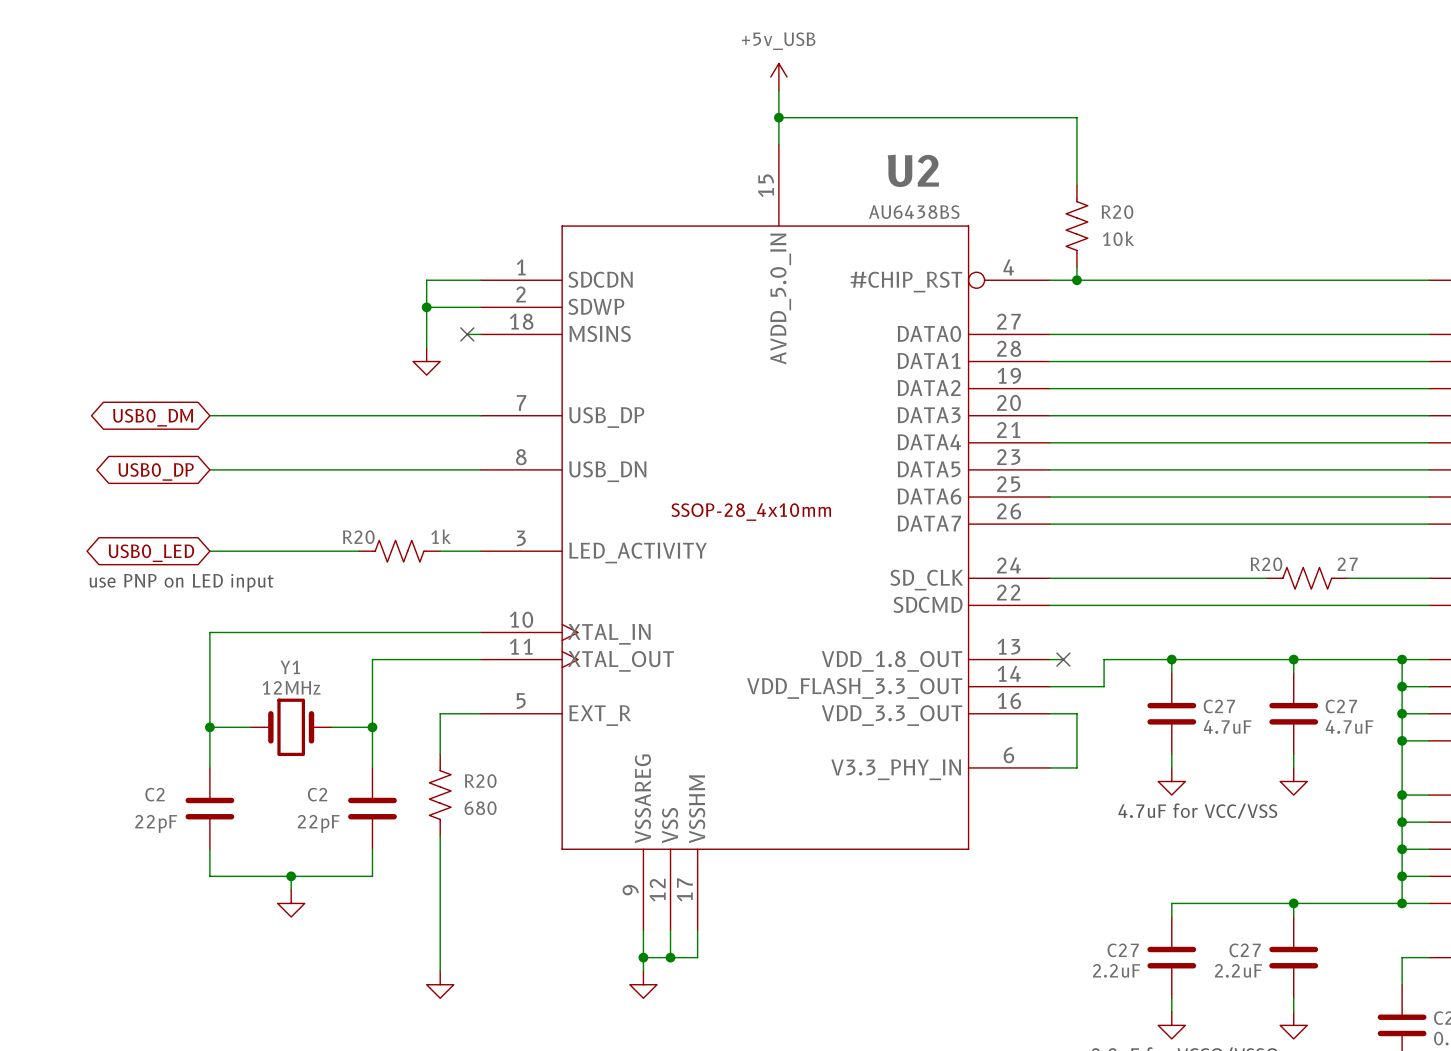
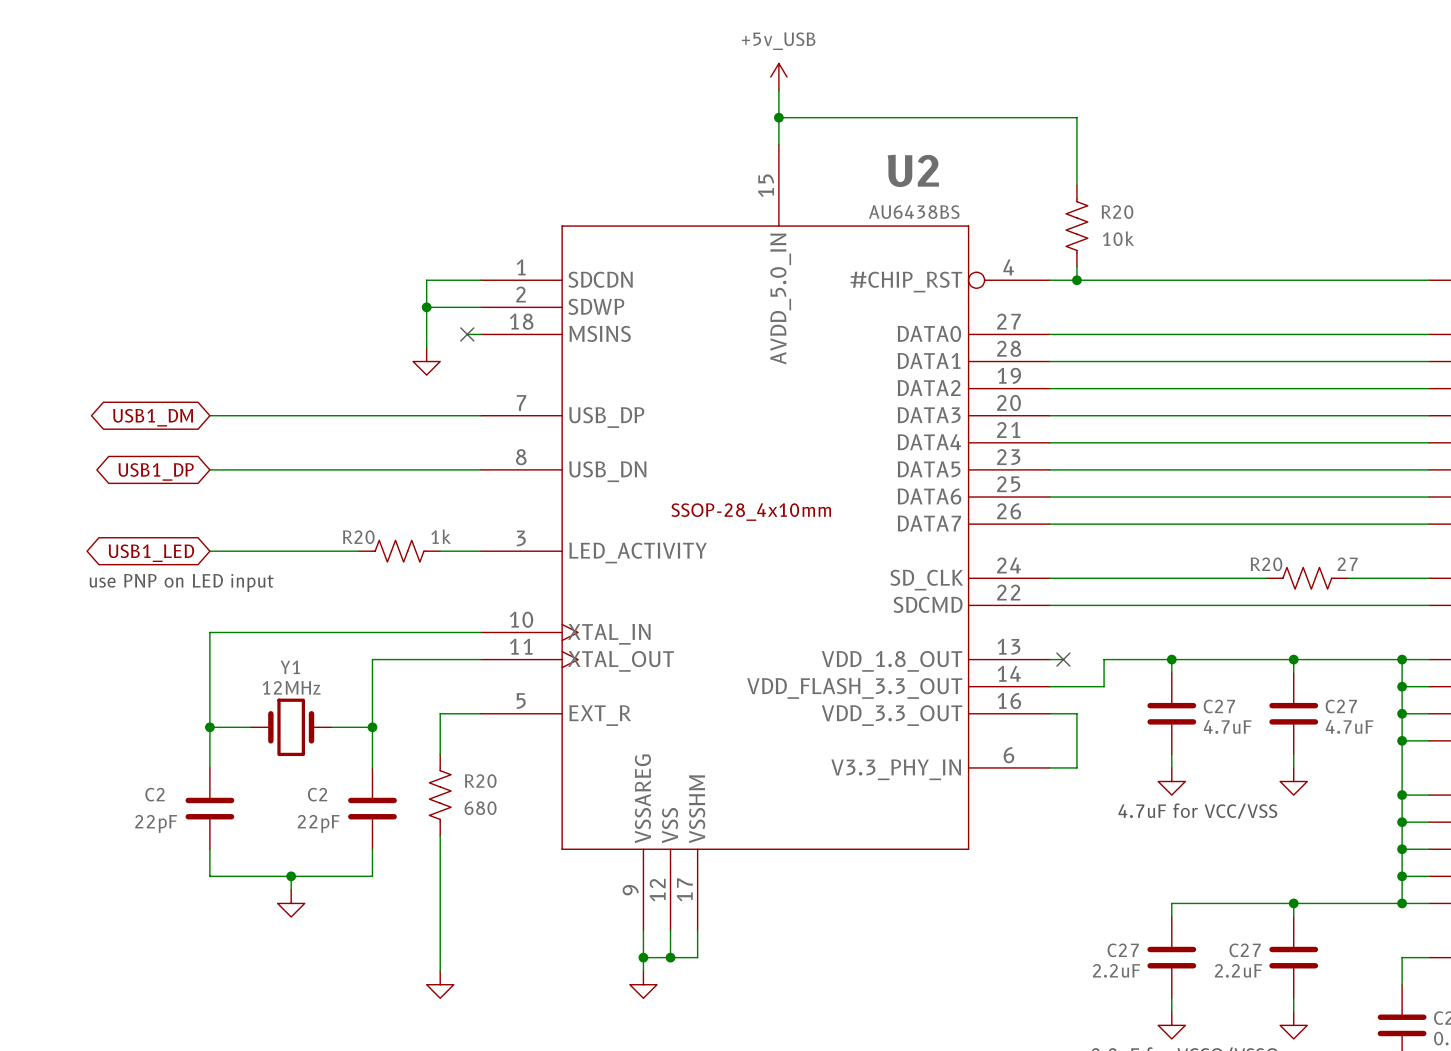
global label: USB0_DM (153, 417) -> USB1_DM (153, 417)
global label: USB0_DP (156, 471) -> USB1_DP (156, 471)
global label: USB0_LED (151, 553) -> USB1_LED (151, 553)

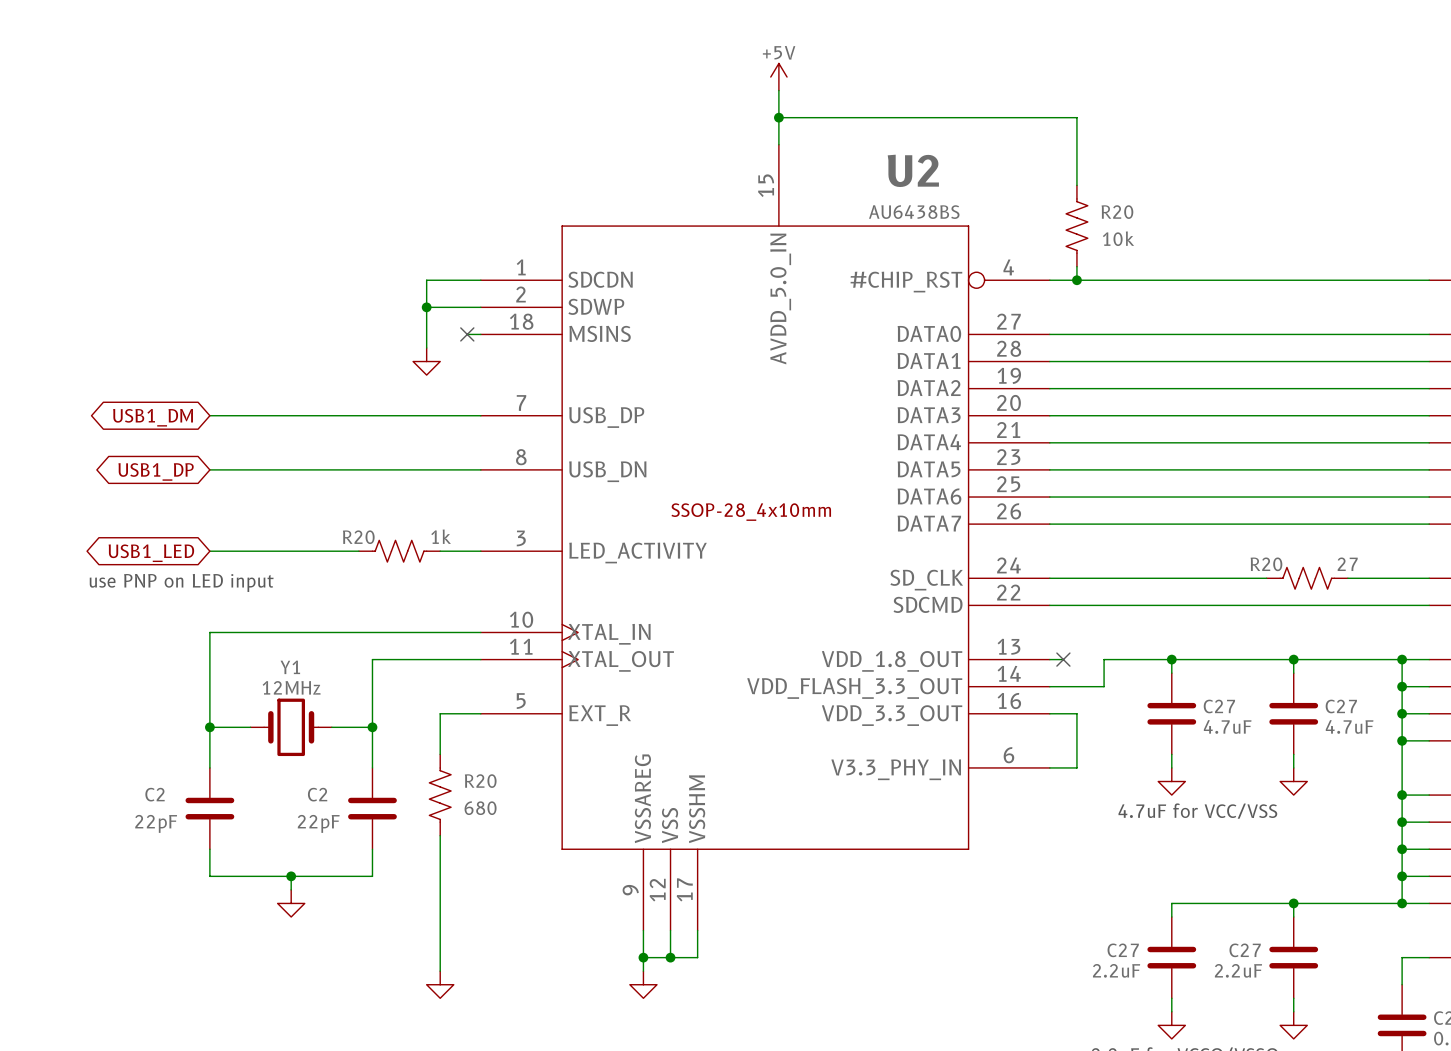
power symbol: +5v_USB (778, 77) -> +5V (778, 77)

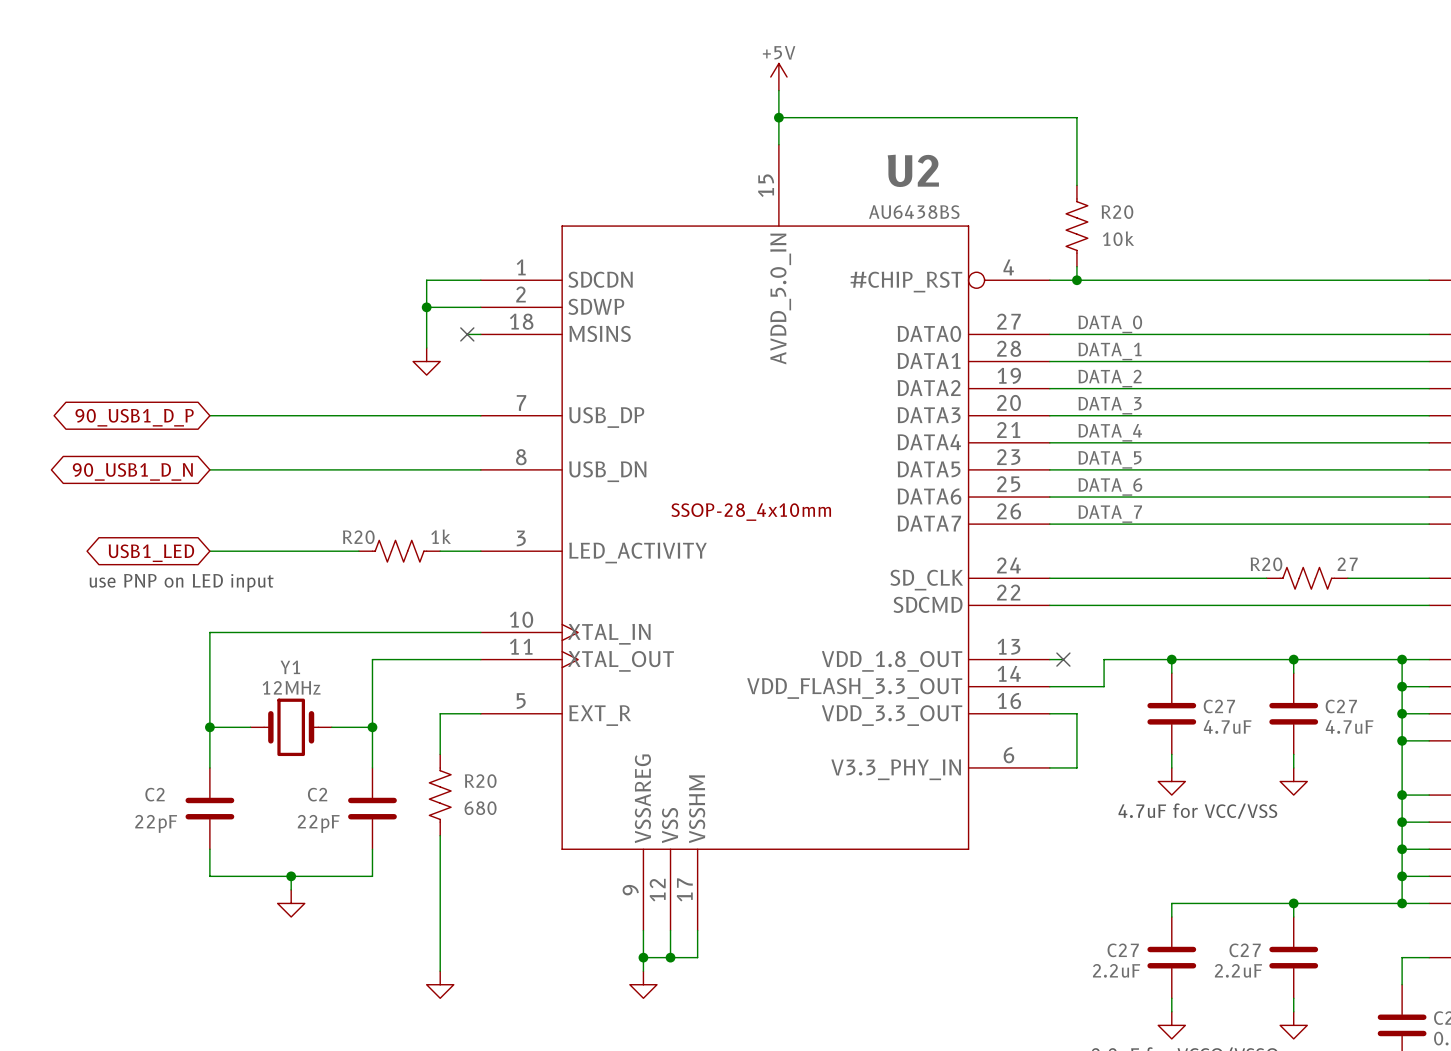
label: none -> DATA_0 (1110, 324)
label: none -> DATA_1 (1110, 351)
label: none -> DATA_2 (1110, 378)
label: none -> DATA_3 (1110, 405)
global label: USB1_DM (153, 417) -> 90_USB1_D_P (134, 417)
label: none -> DATA_4 (1110, 432)
label: none -> DATA_5 (1110, 459)
global label: USB1_DP (156, 471) -> 90_USB1_D_N (132, 471)
label: none -> DATA_6 (1110, 486)
label: none -> DATA_7 (1110, 514)

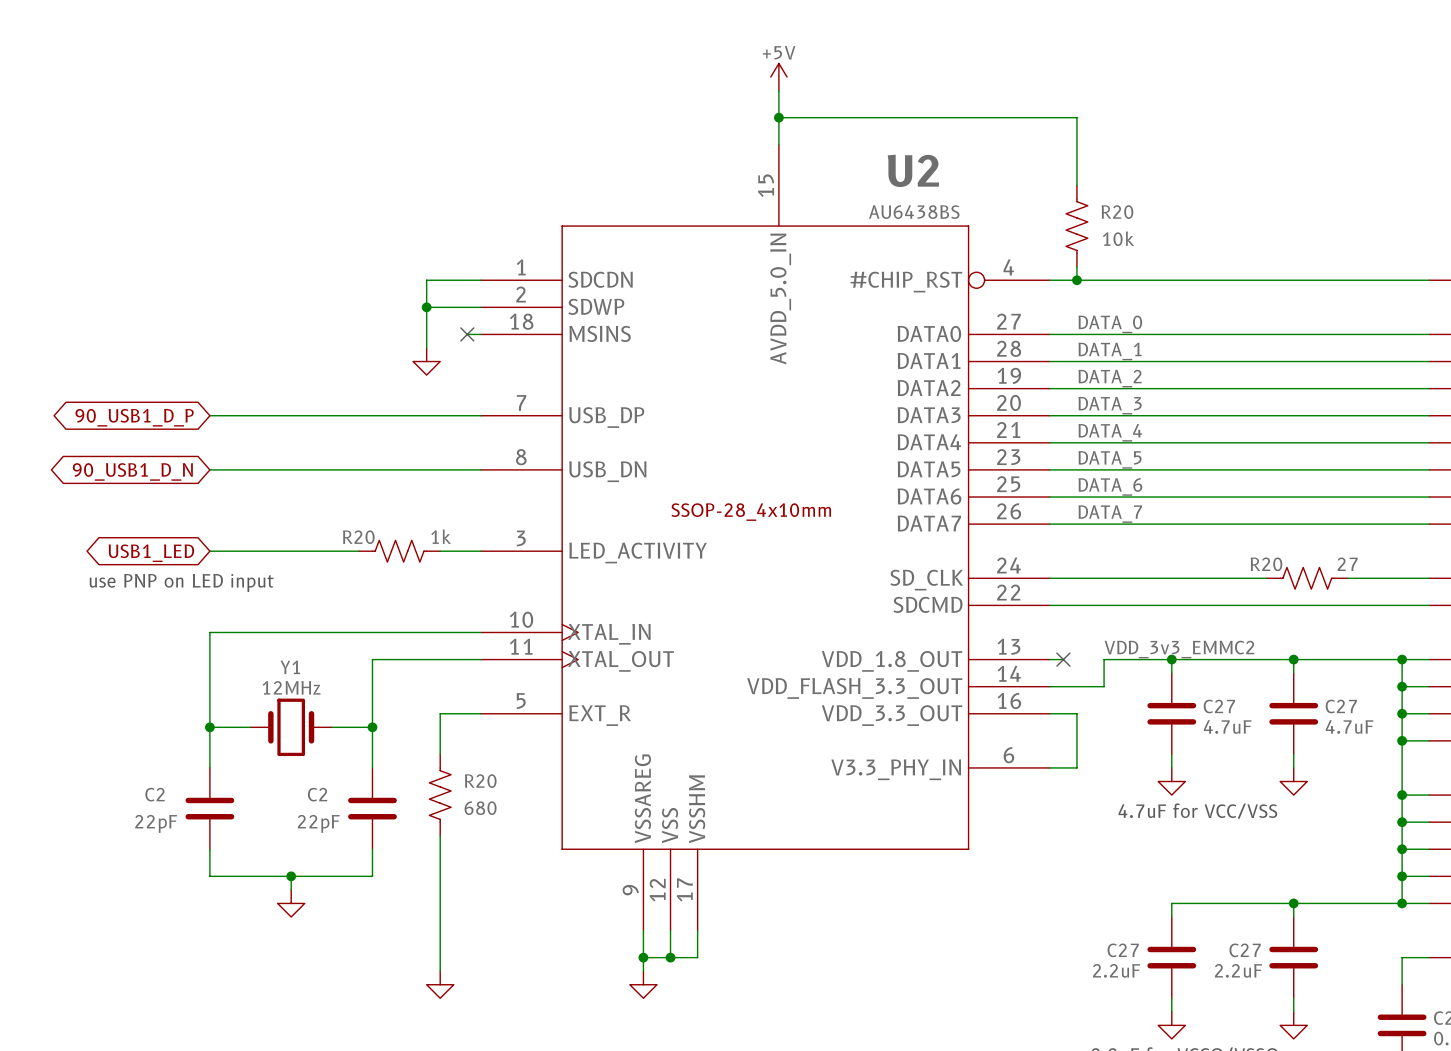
label: none -> VDD_3v3_EMMC2 (1179, 649)

